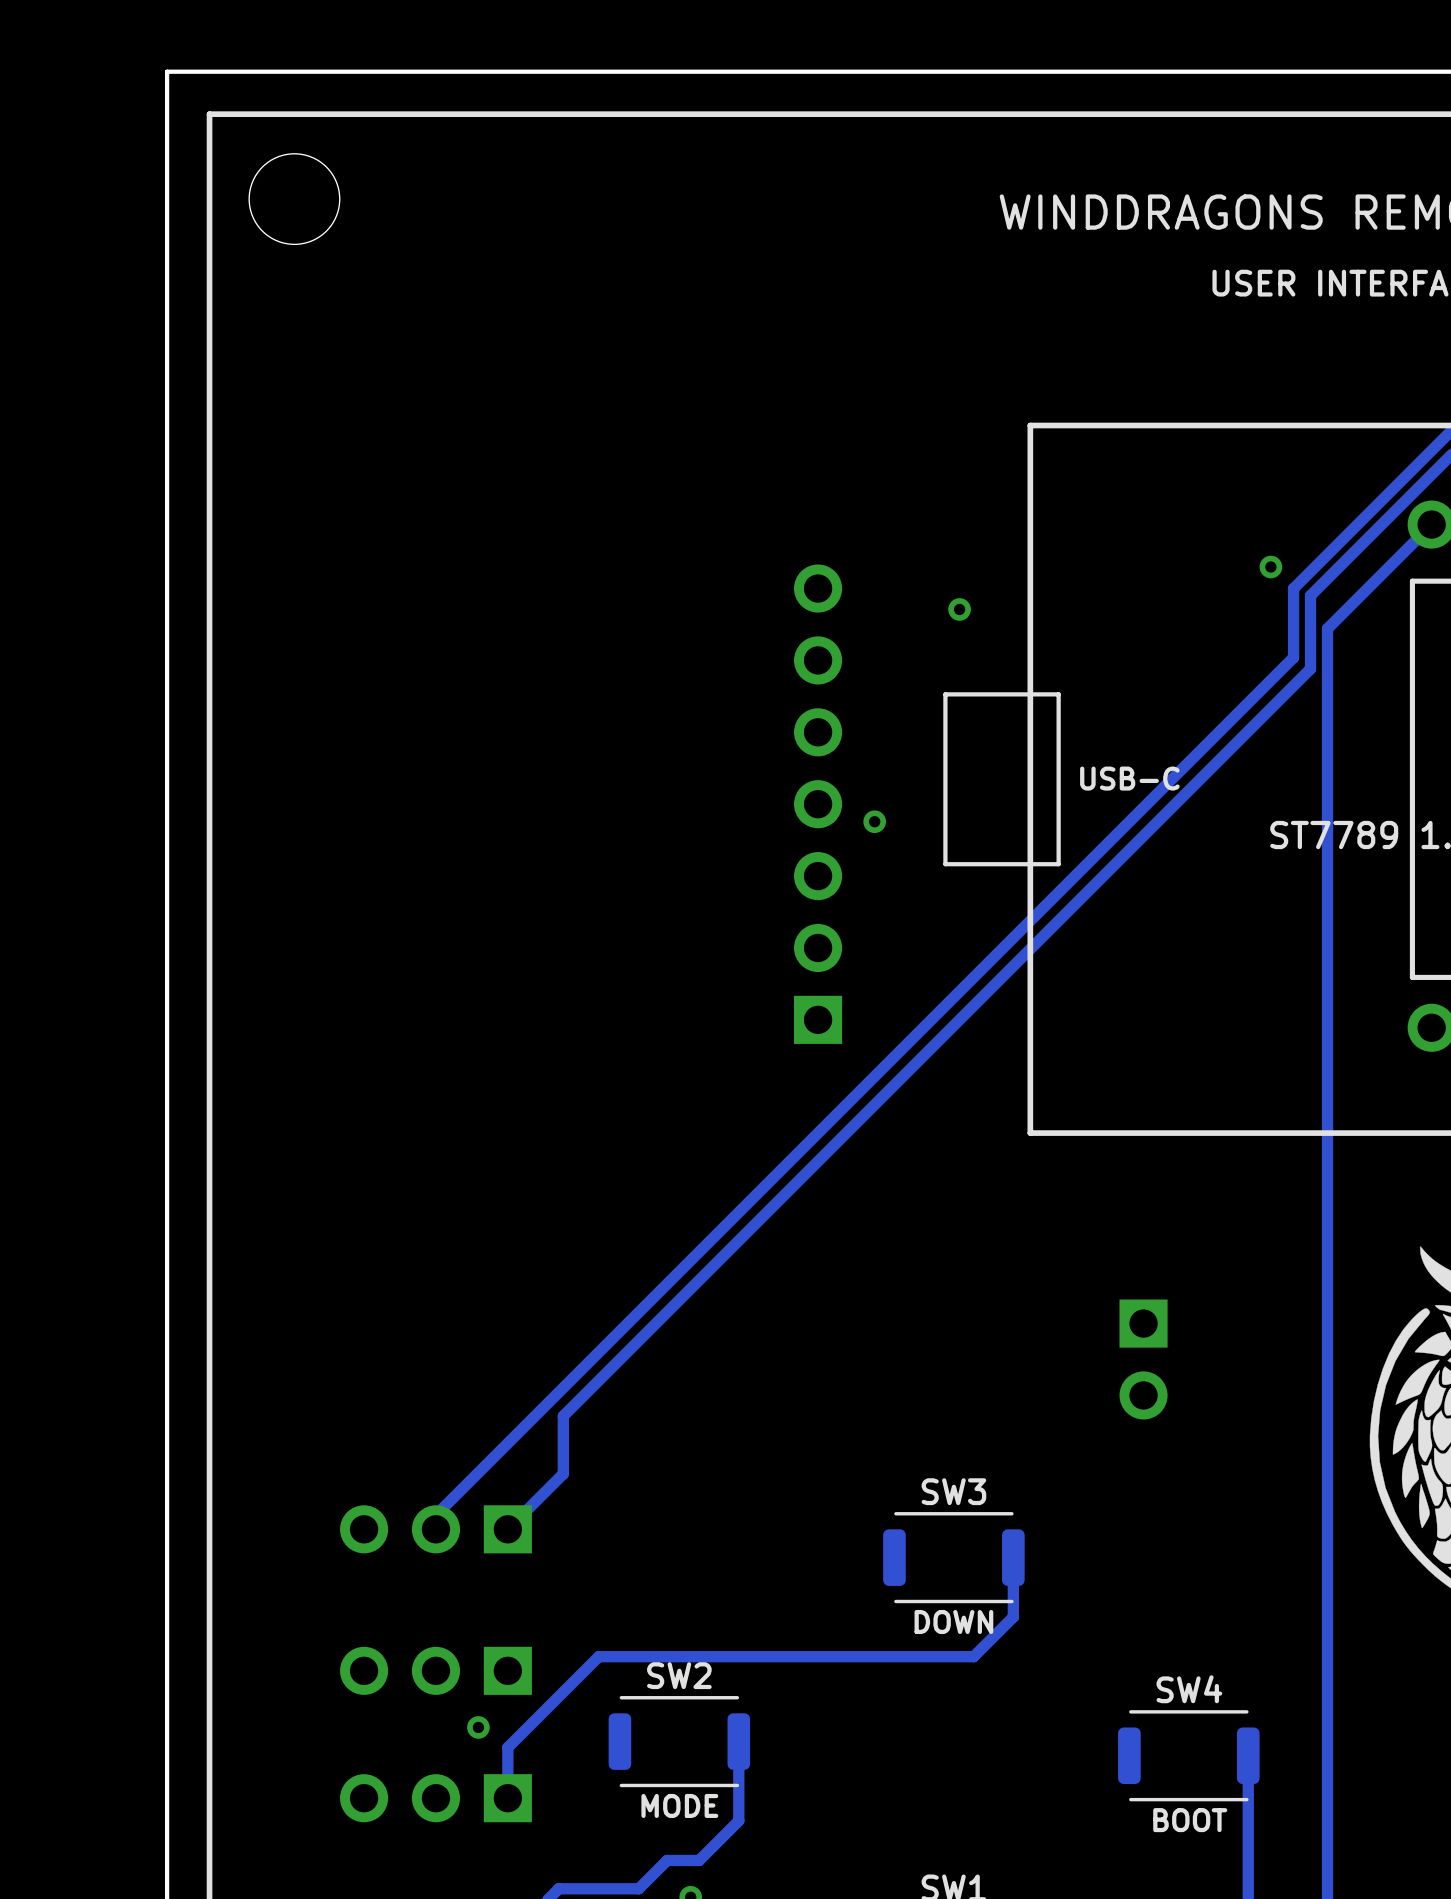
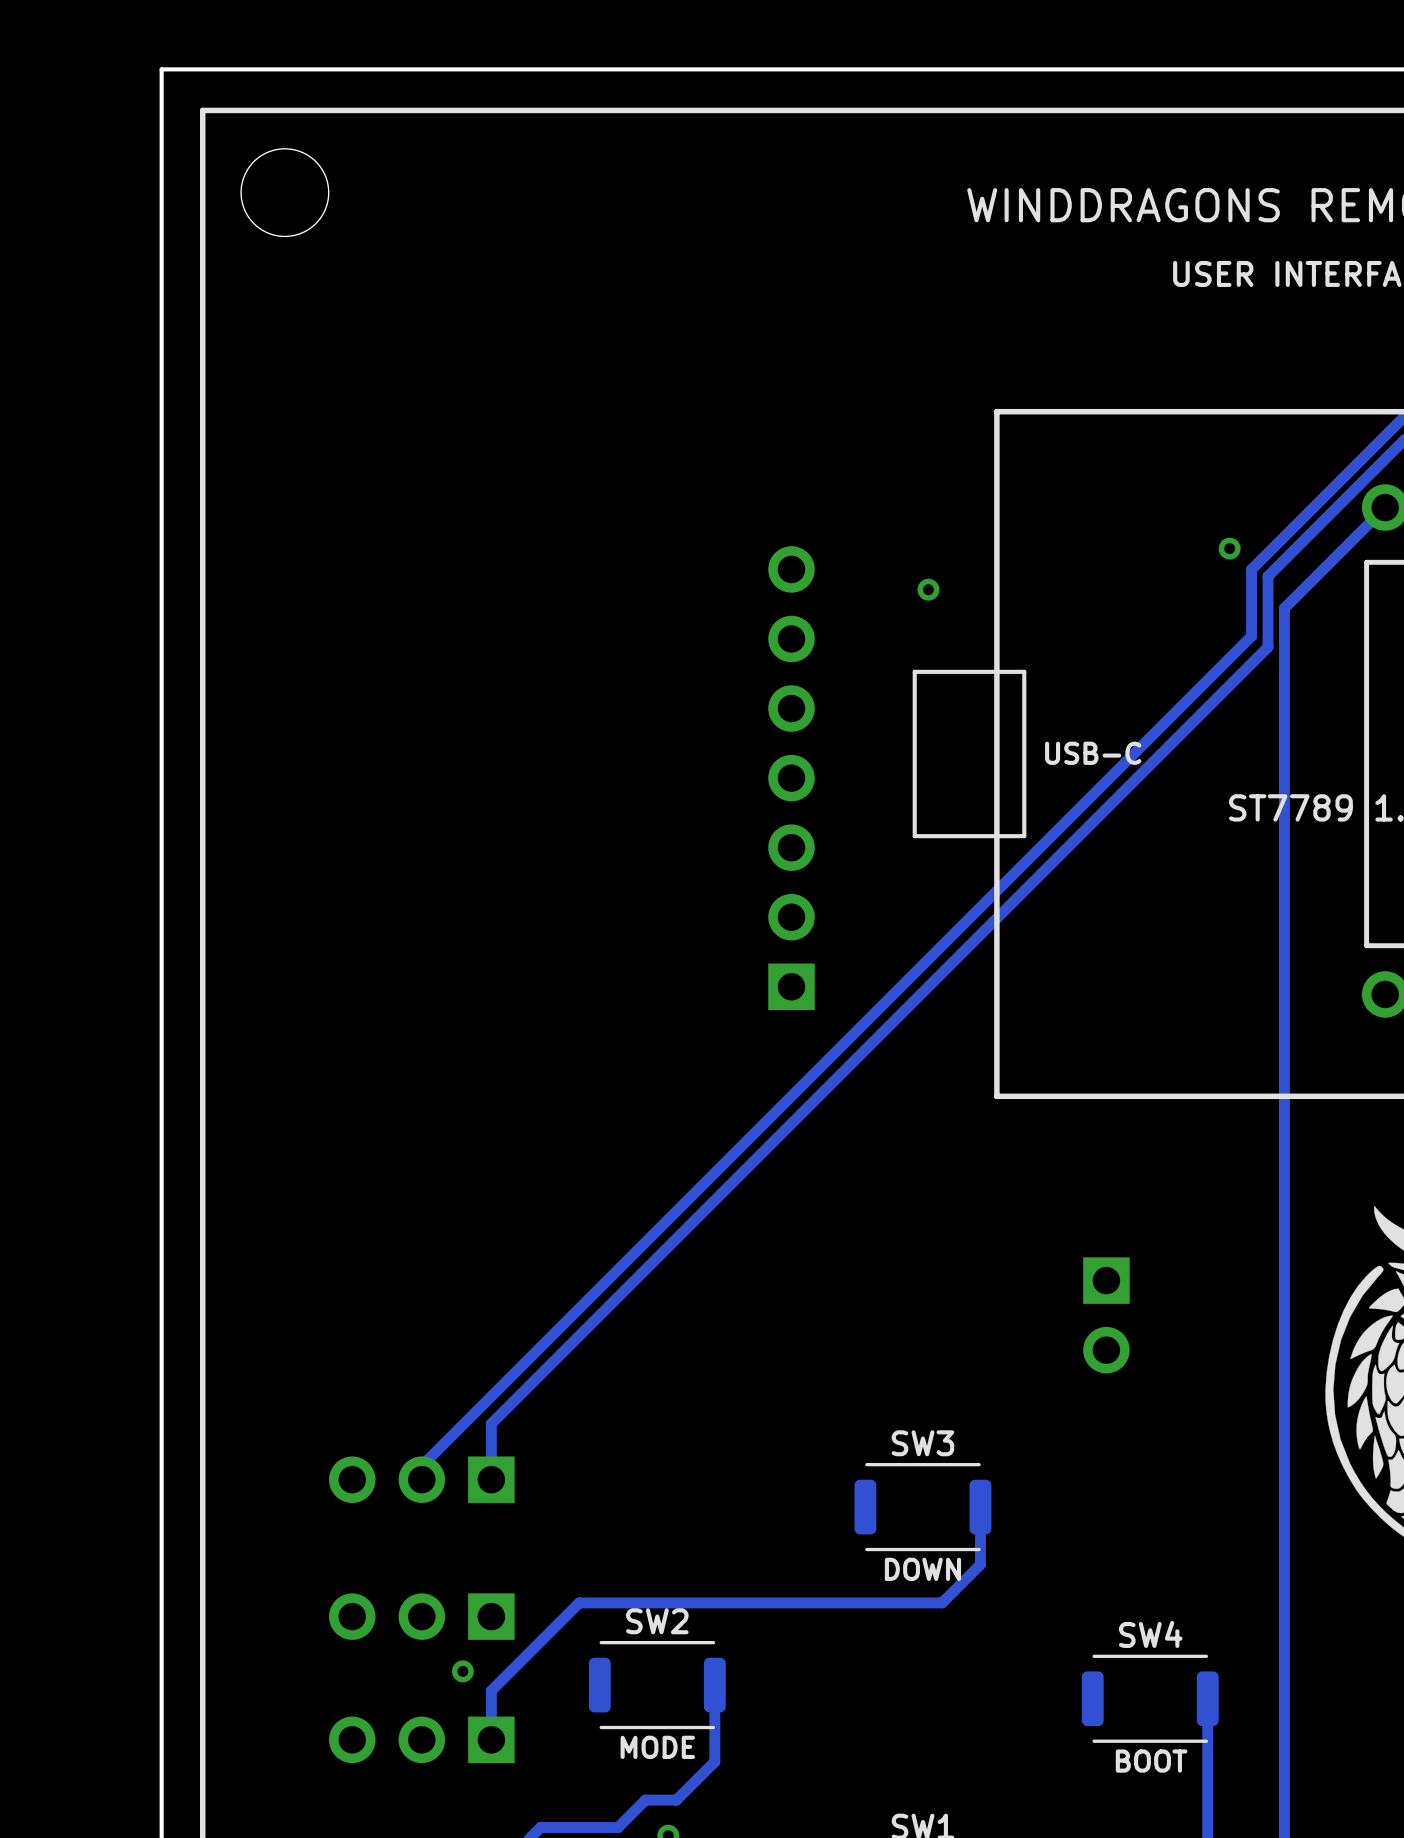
via: (874, 821) -> none
track: (563, 1416) (563, 1473) (507, 1529) -> (545, 1370) (491, 1423) (491, 1479)

